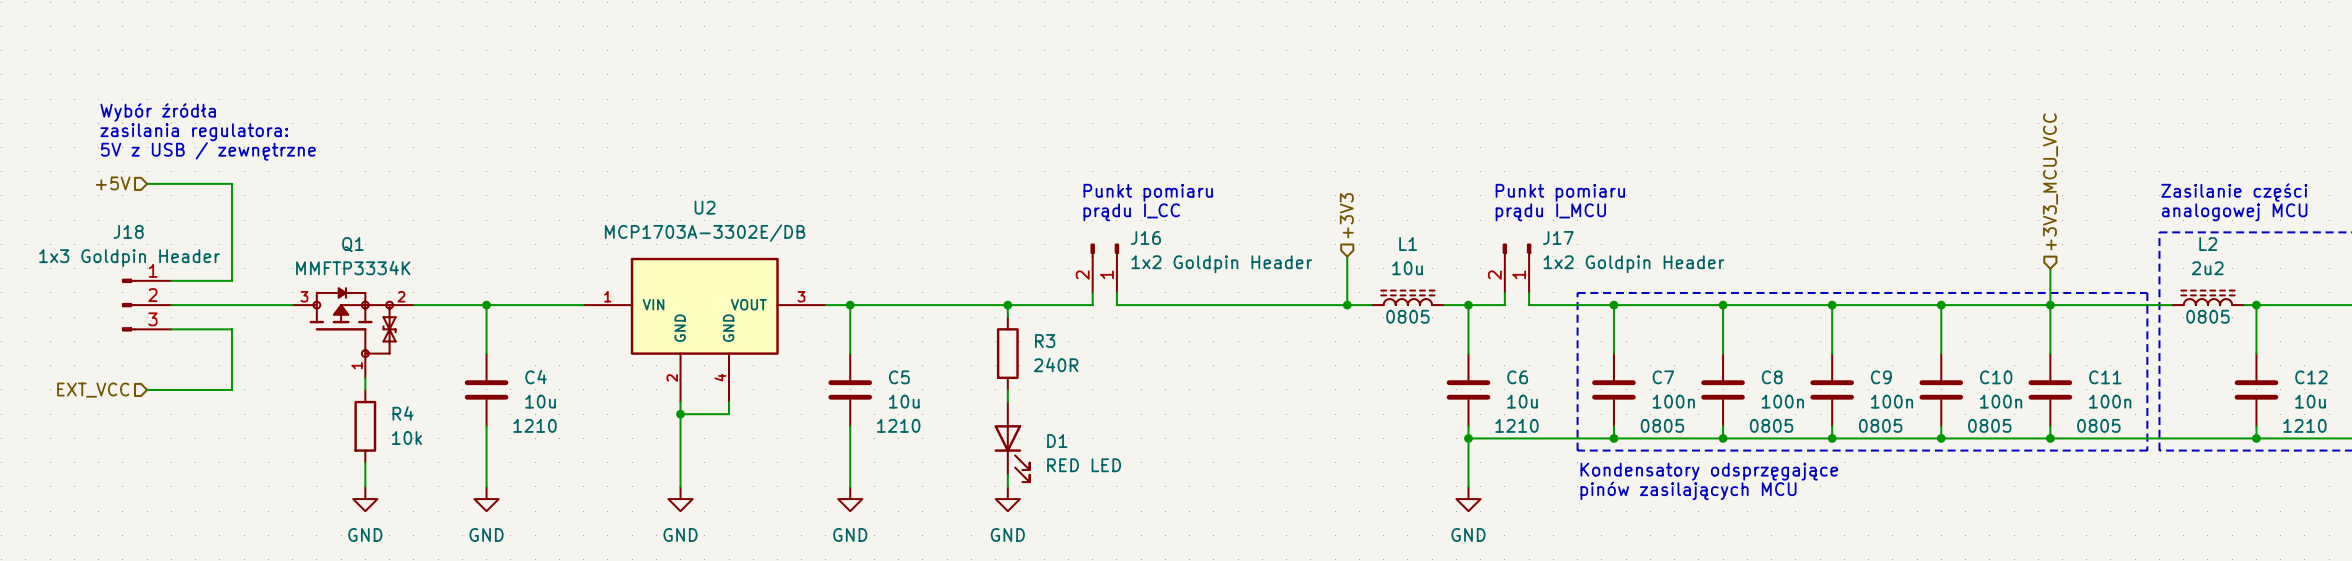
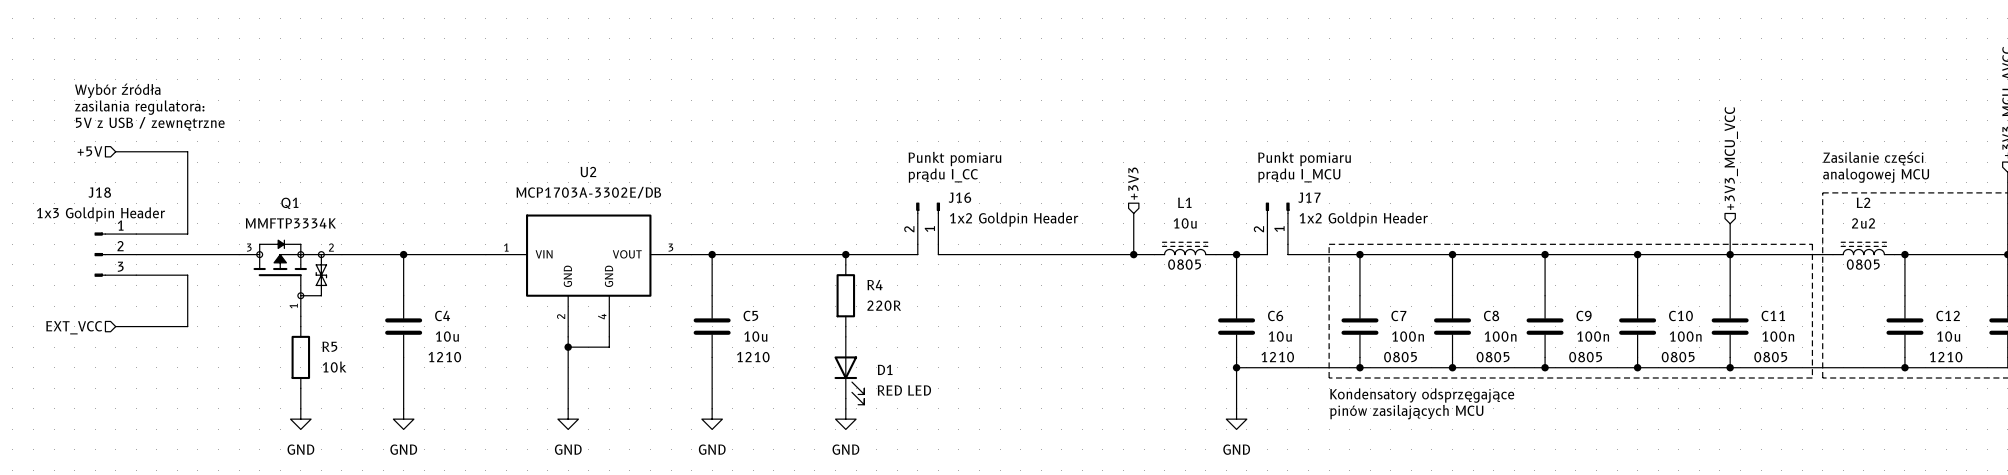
R3 name: R3 (1045, 341) -> R4 (875, 285)
R3 value: 240R (1056, 364) -> 220R (884, 305)
R4 name: R4 (402, 413) -> R5 (329, 346)

